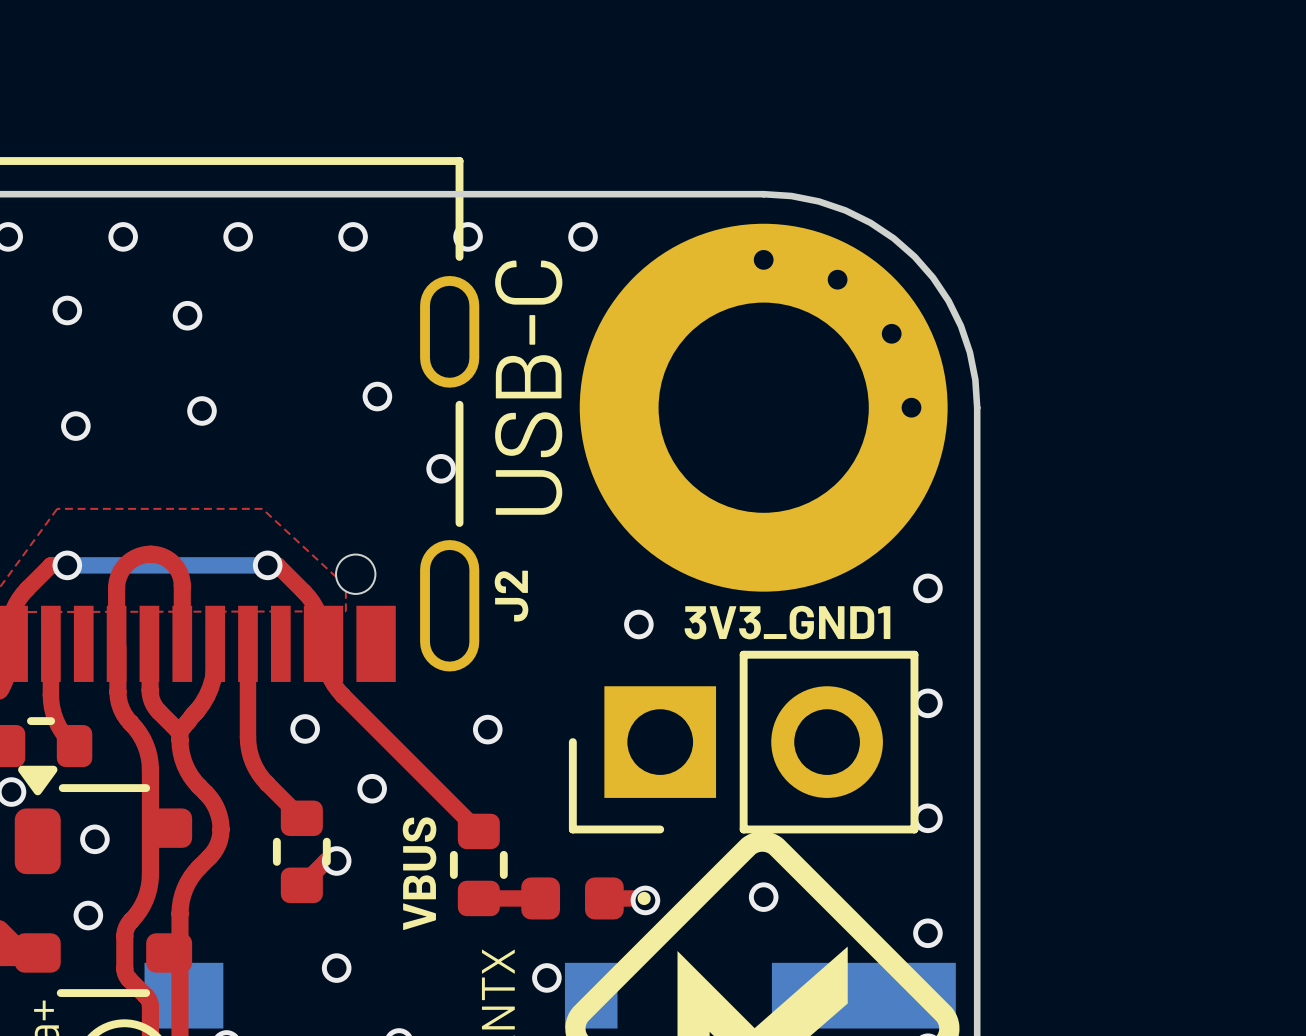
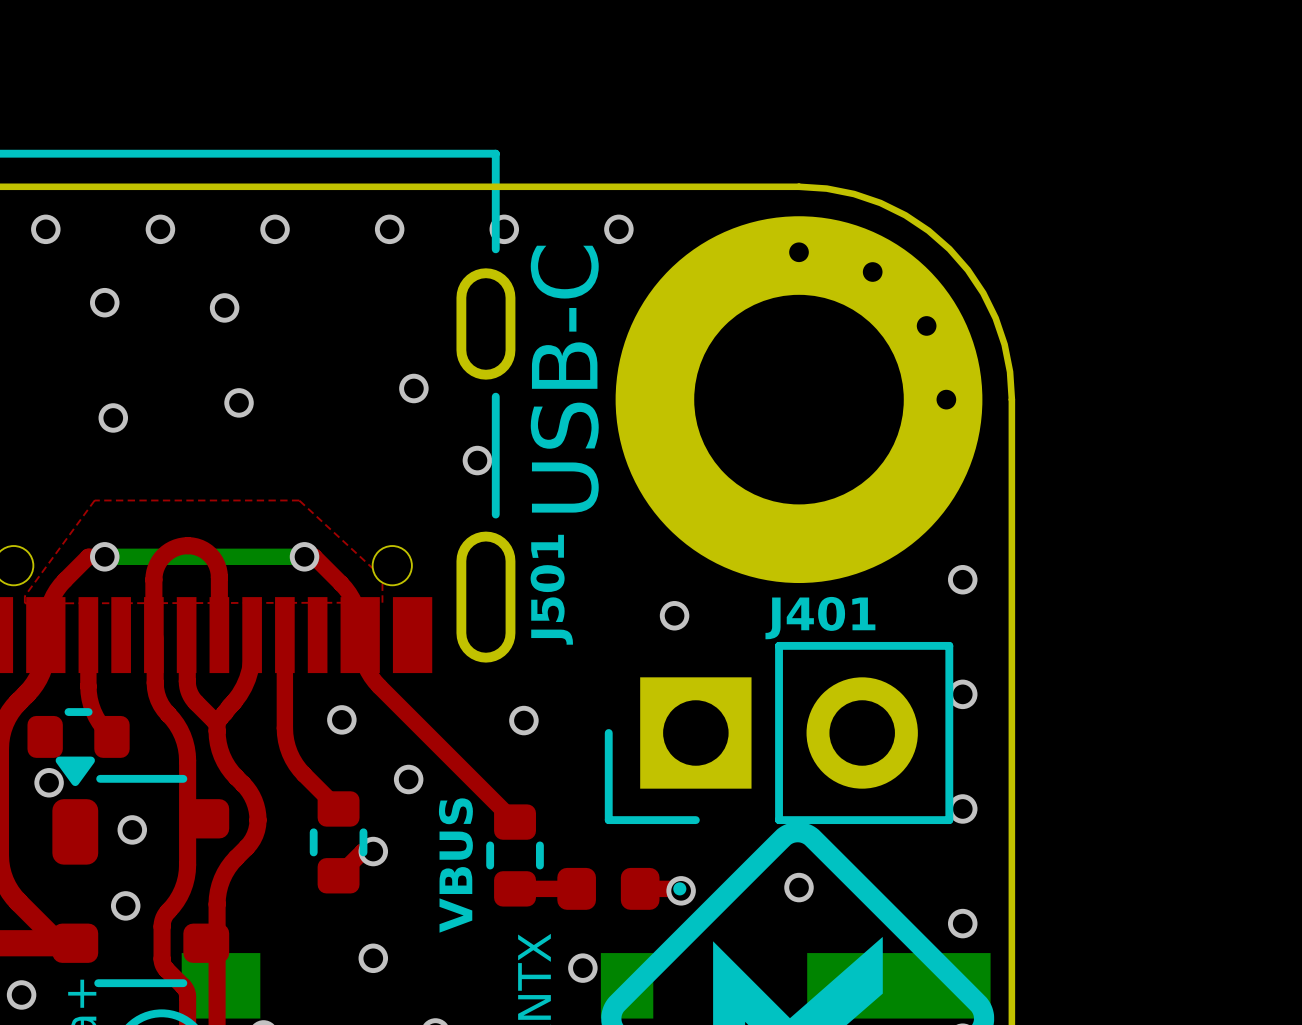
J2 name: J2 (511, 596) -> J501 (551, 589)
3V3_GND1 name: 3V3_GND1 (787, 622) -> J401 (820, 618)

